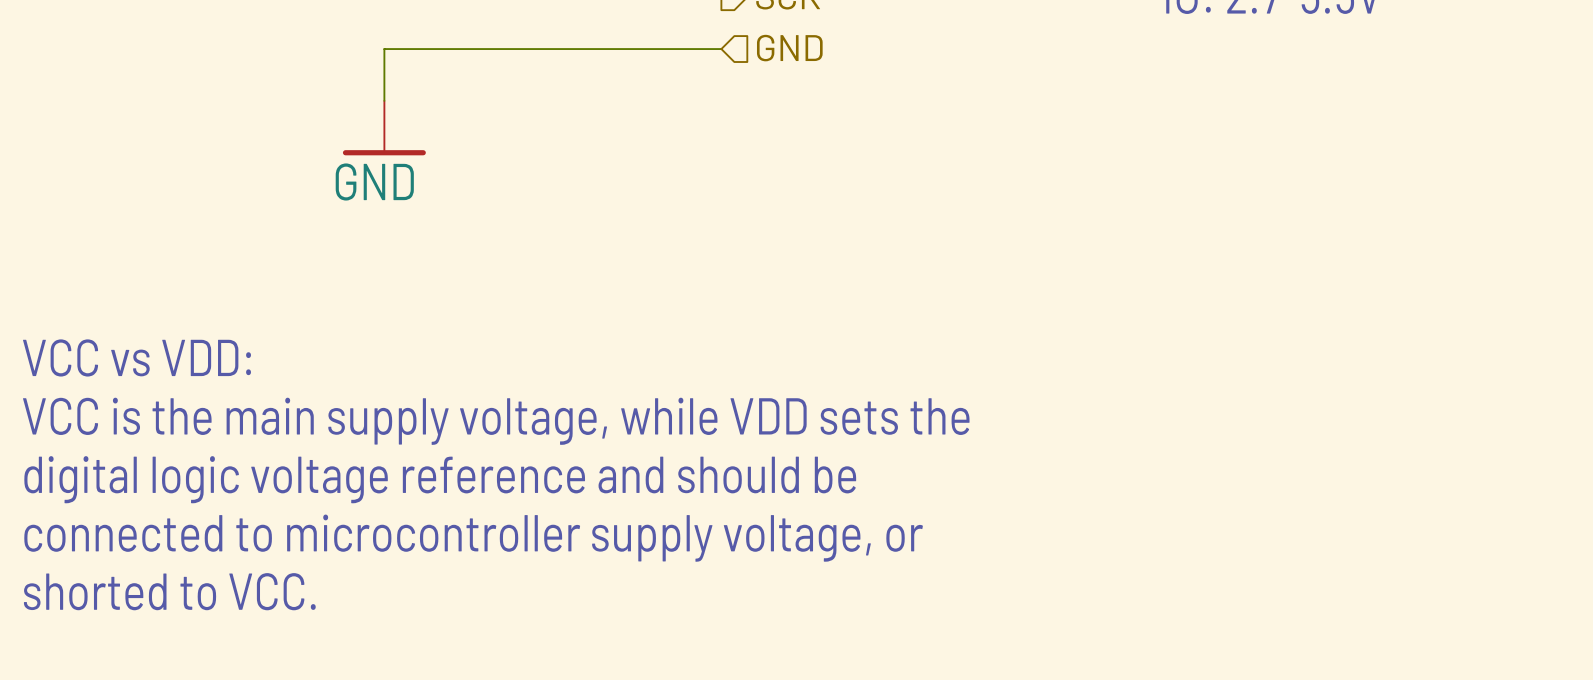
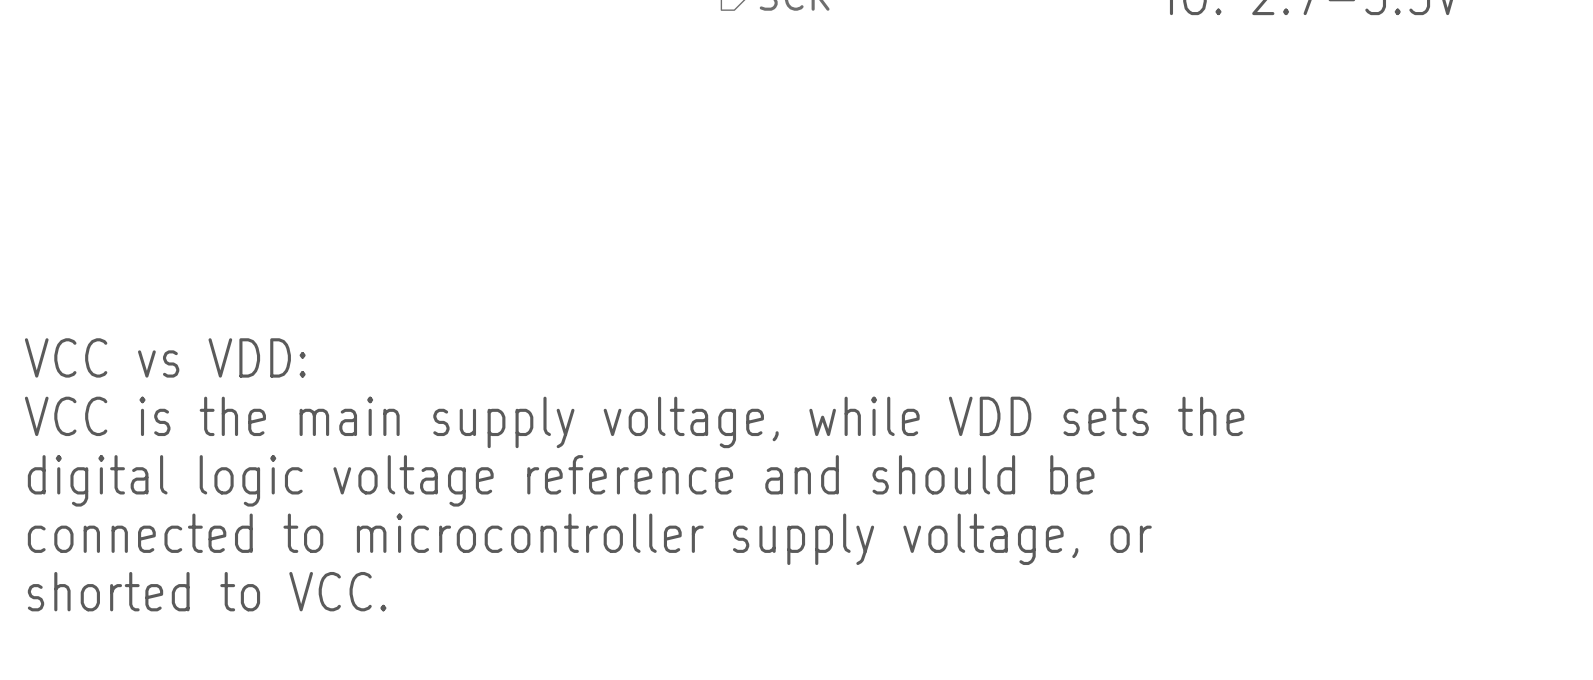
hierarchical label: GND (789, 48) -> none
wire: (721, 49) (384, 49) (384, 100) -> none
power symbol: GND (384, 128) -> none

